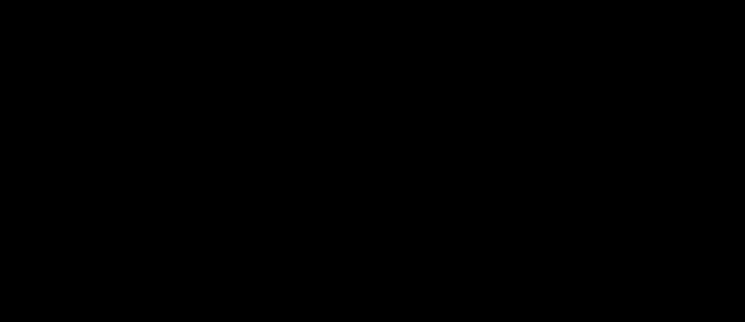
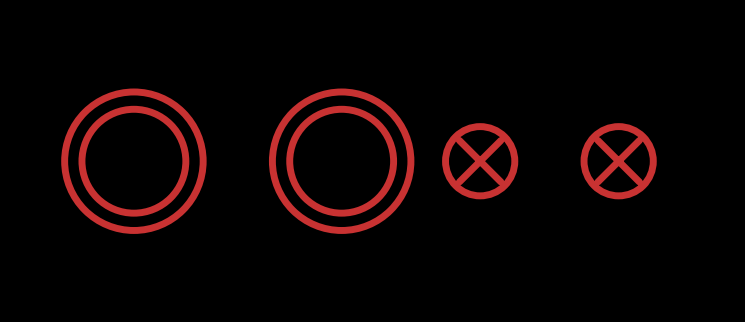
part: none -> (133, 161)
part: none -> (341, 161)
part: none -> (480, 161)
part: none -> (618, 161)

